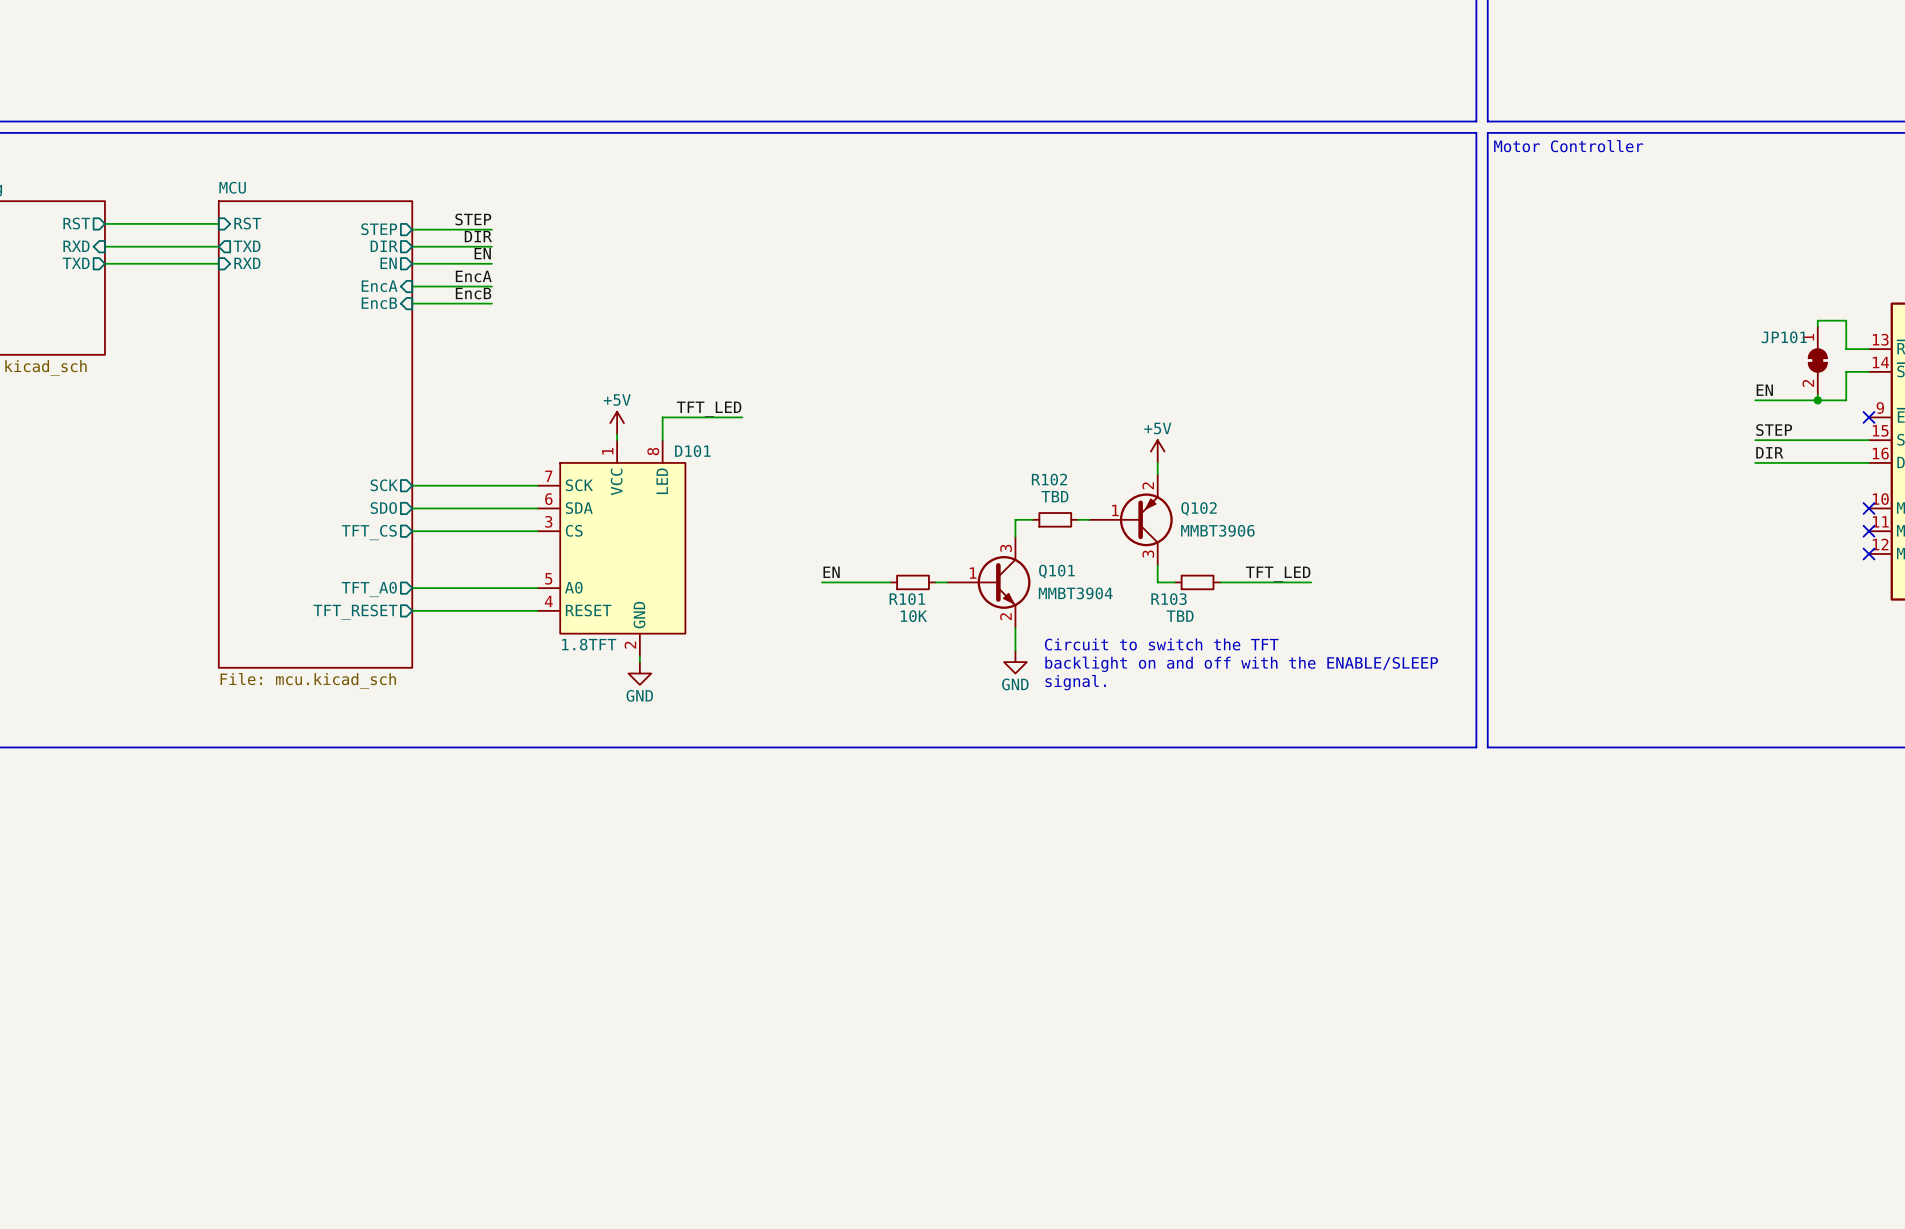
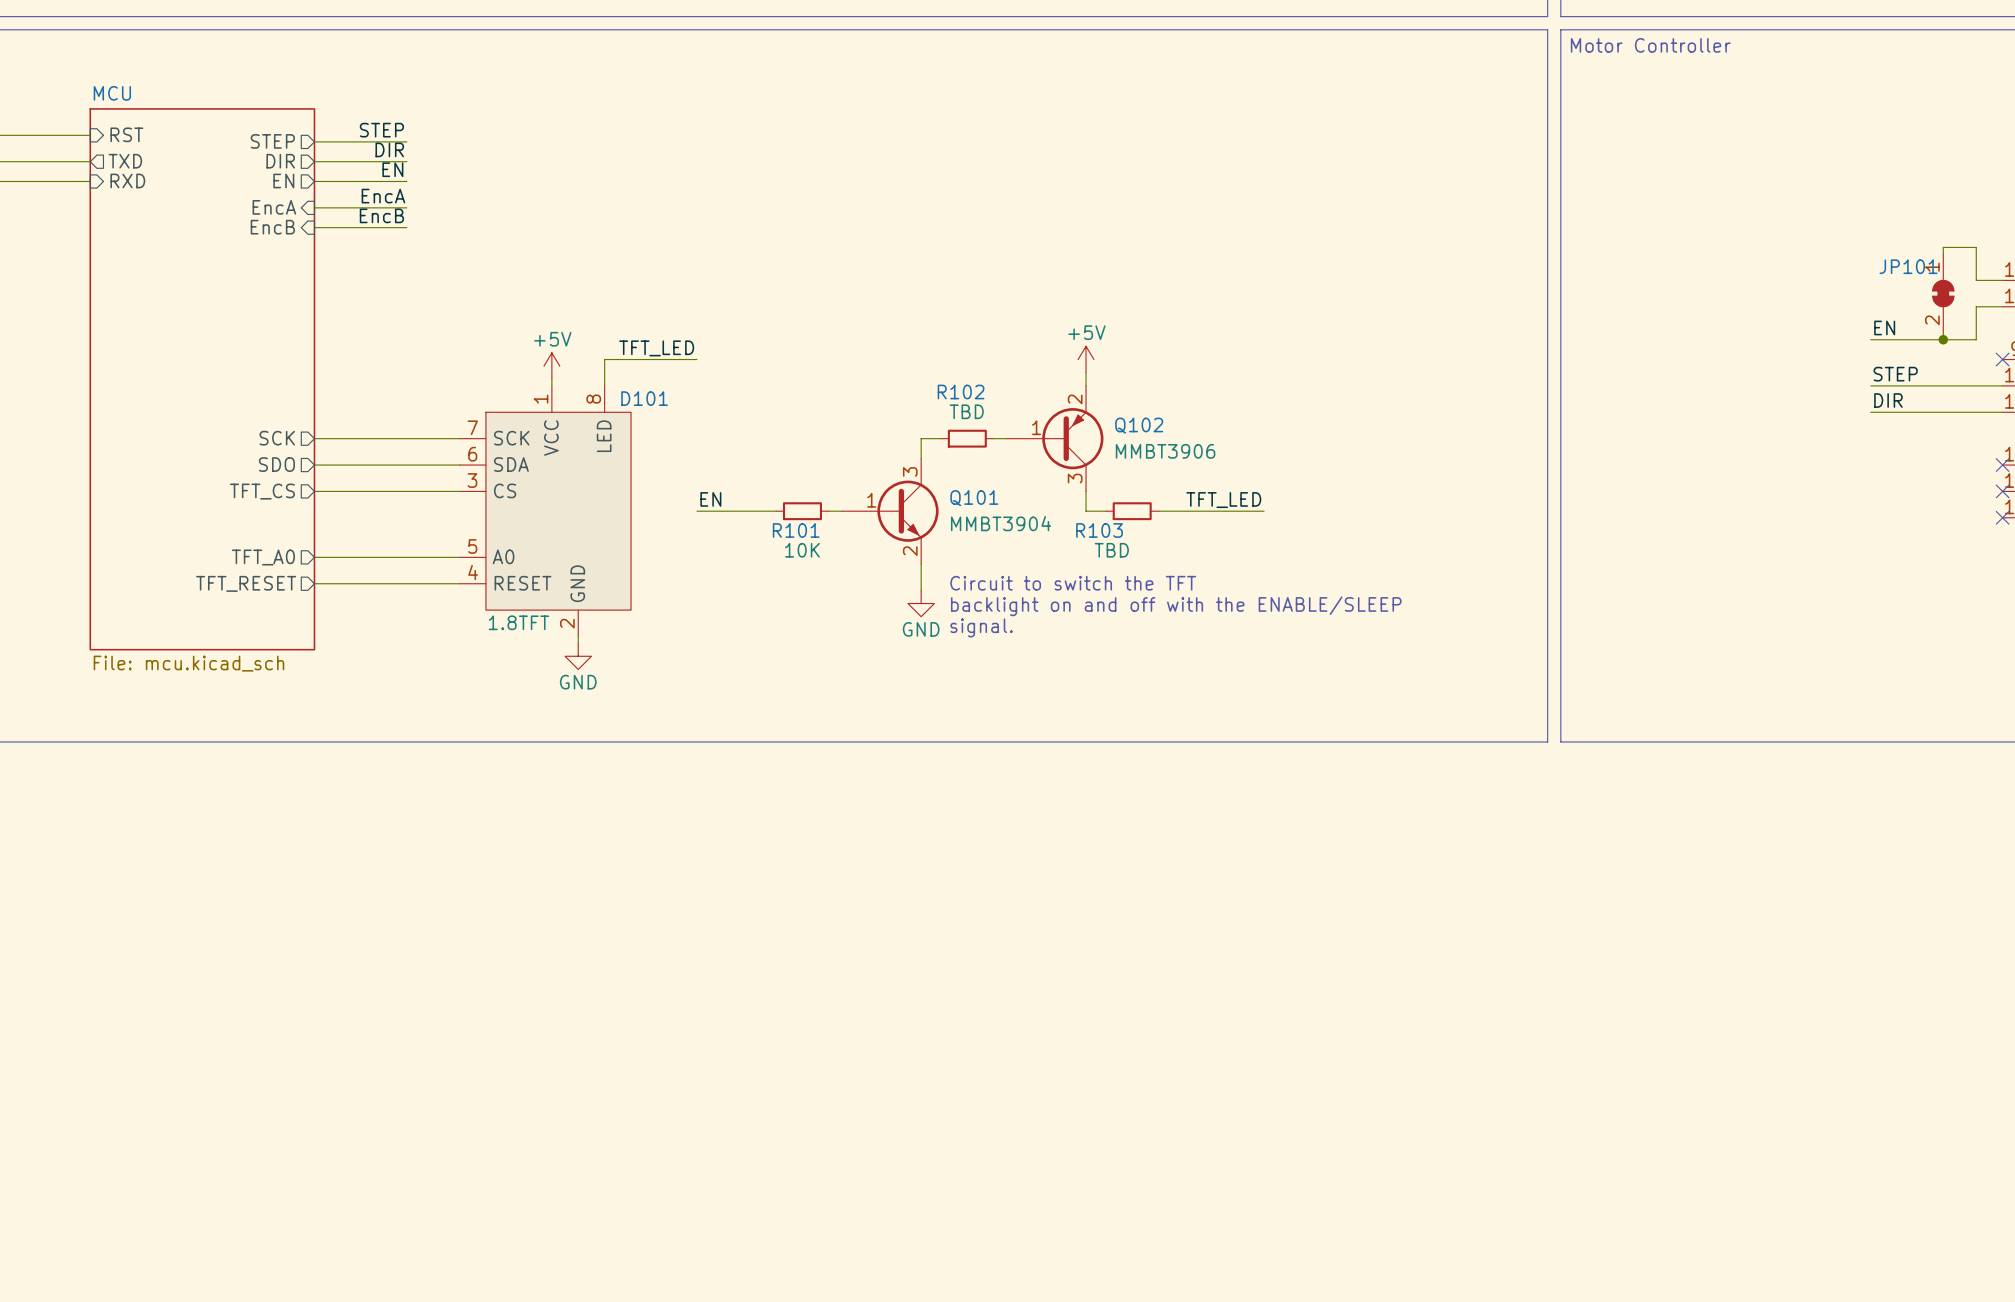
power symbol position: +5V (1157, 451) -> +5V (1086, 359)
wire: (1157, 462) (1157, 474) -> (1086, 372) (1086, 385)
wire: (1032, 519) (1015, 519) (1015, 536) -> (940, 438) (921, 438) (921, 458)
R102 position: (1055, 519) -> (967, 438)
wire: (1078, 519) (1089, 519) -> (993, 438) (1006, 438)
Q102 position: (1131, 519) -> (1055, 438)
wire: (1157, 565) (1157, 582) (1174, 582) -> (1086, 491) (1086, 511) (1105, 511)
label position: EN (831, 572) -> EN (710, 499)
label position: TFT_LED (1278, 574) -> TFT_LED (1223, 500)
wire: (821, 582) (890, 582) -> (696, 511) (776, 511)
R101 position: (913, 582) -> (802, 511)
wire: (935, 582) (947, 582) -> (828, 511) (842, 511)
Q101 position: (988, 582) -> (890, 511)
R103 position: (1197, 582) -> (1132, 511)
wire: (1220, 582) (1311, 582) -> (1158, 511) (1264, 511)
wire: (1015, 627) (1015, 650) -> (921, 563) (921, 590)
text position: Circuit to switch the TFT (1161, 644) -> Circuit to switch the TFT (1073, 583)
power symbol position: GND (1015, 662) -> GND (921, 603)
text position: backlight on and off with the ENABLE/SLEEP (1241, 664) -> backlight on and off with the ENABLE/SLEEP (1176, 606)
text position: signal. (1075, 682) -> signal. (981, 627)

